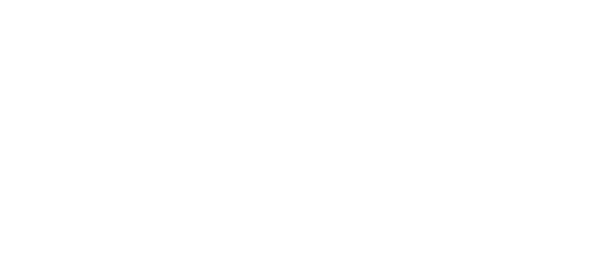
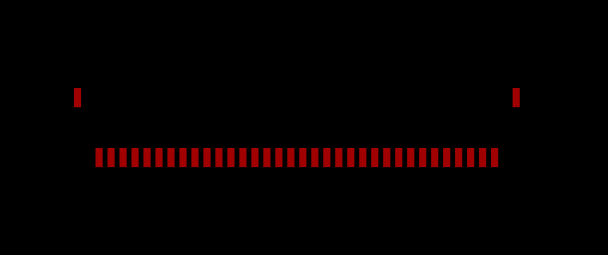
part: none -> (296, 127)

